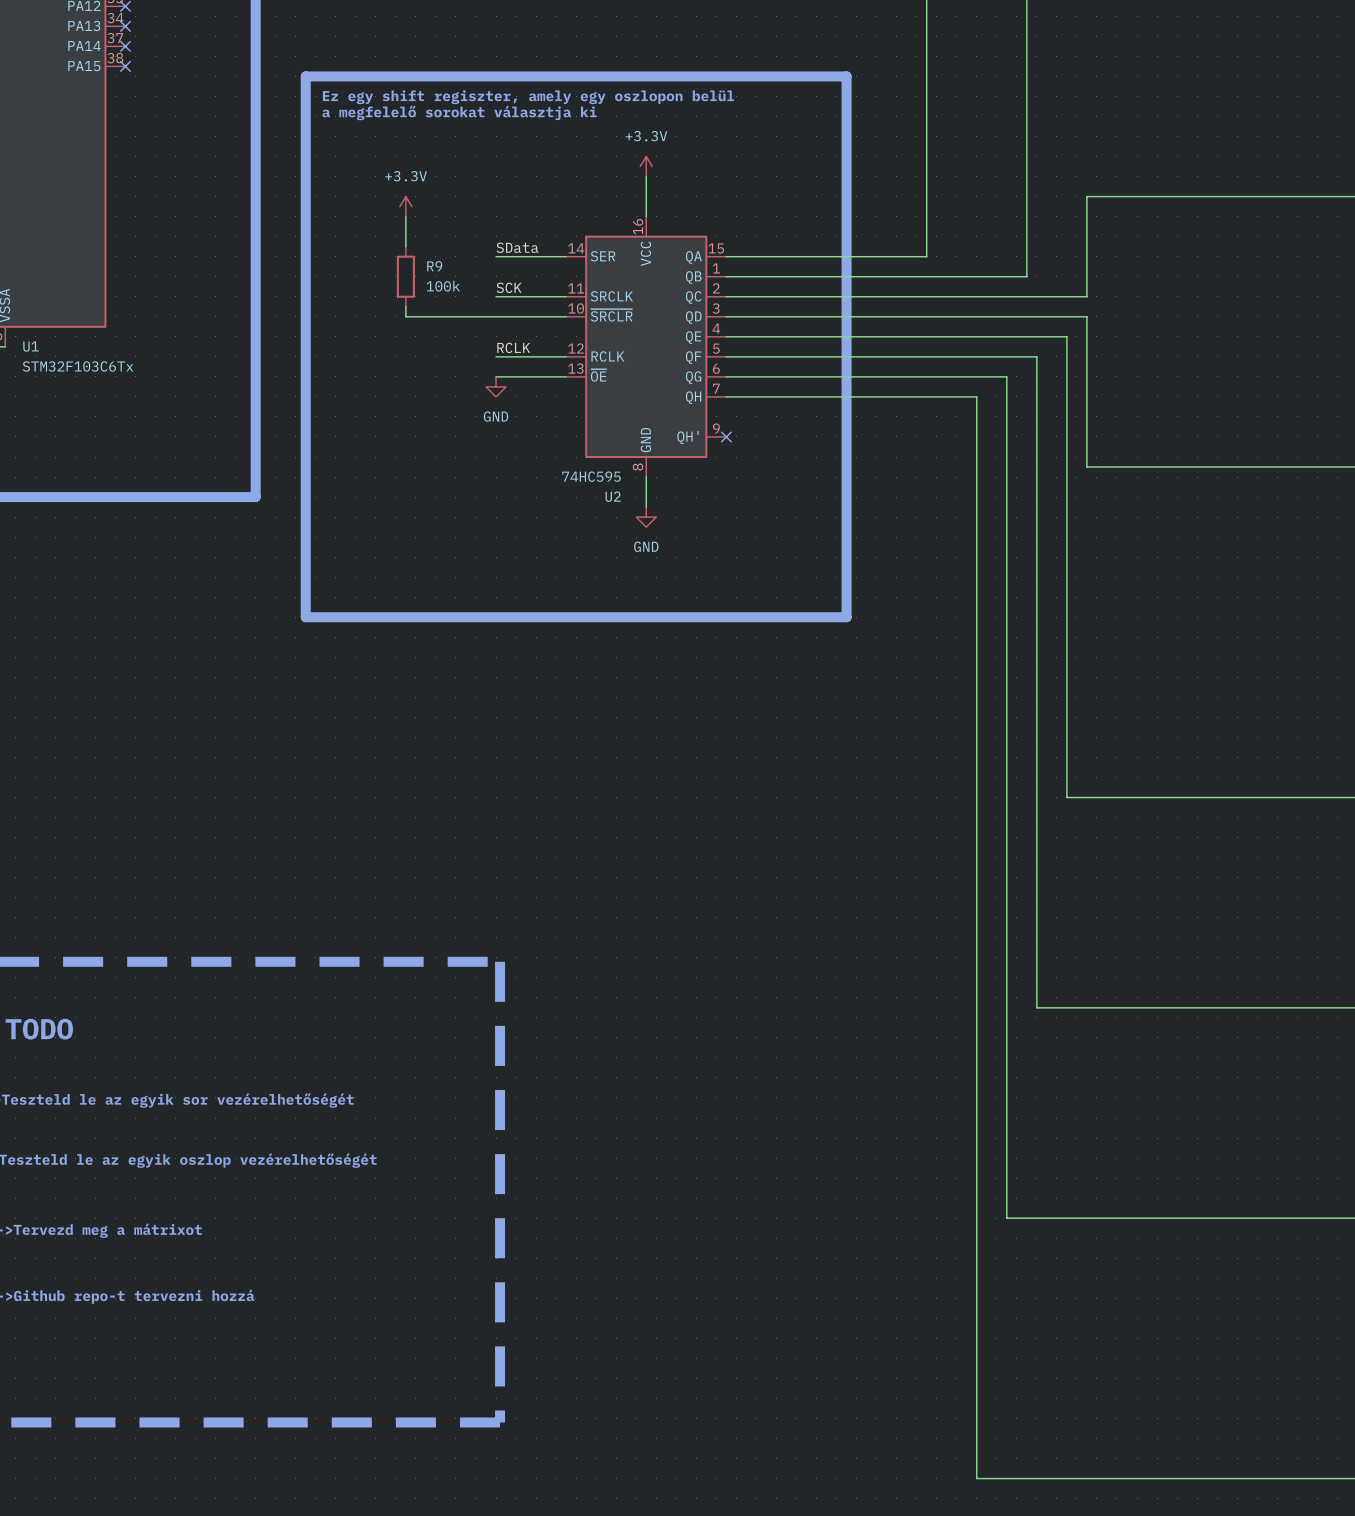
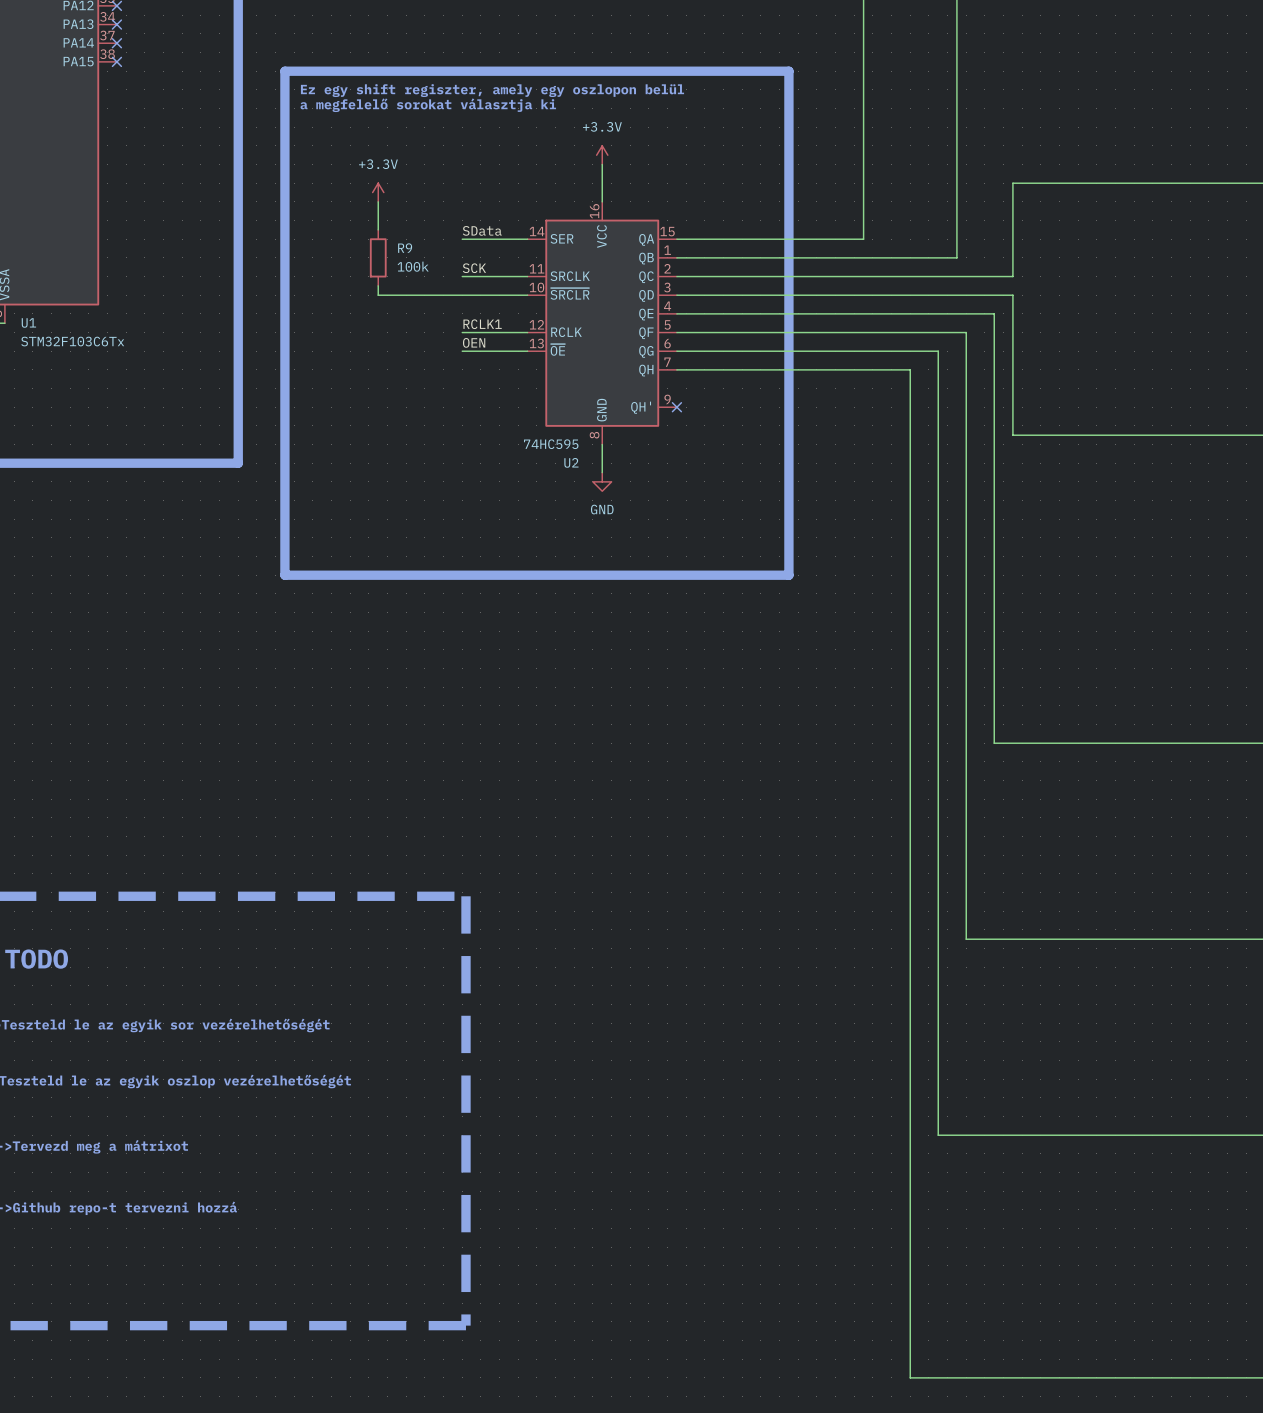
label: RCLK (513, 347) -> RCLK1 (482, 324)
label: none -> OEN (474, 342)
power symbol: GND (496, 386) -> none

